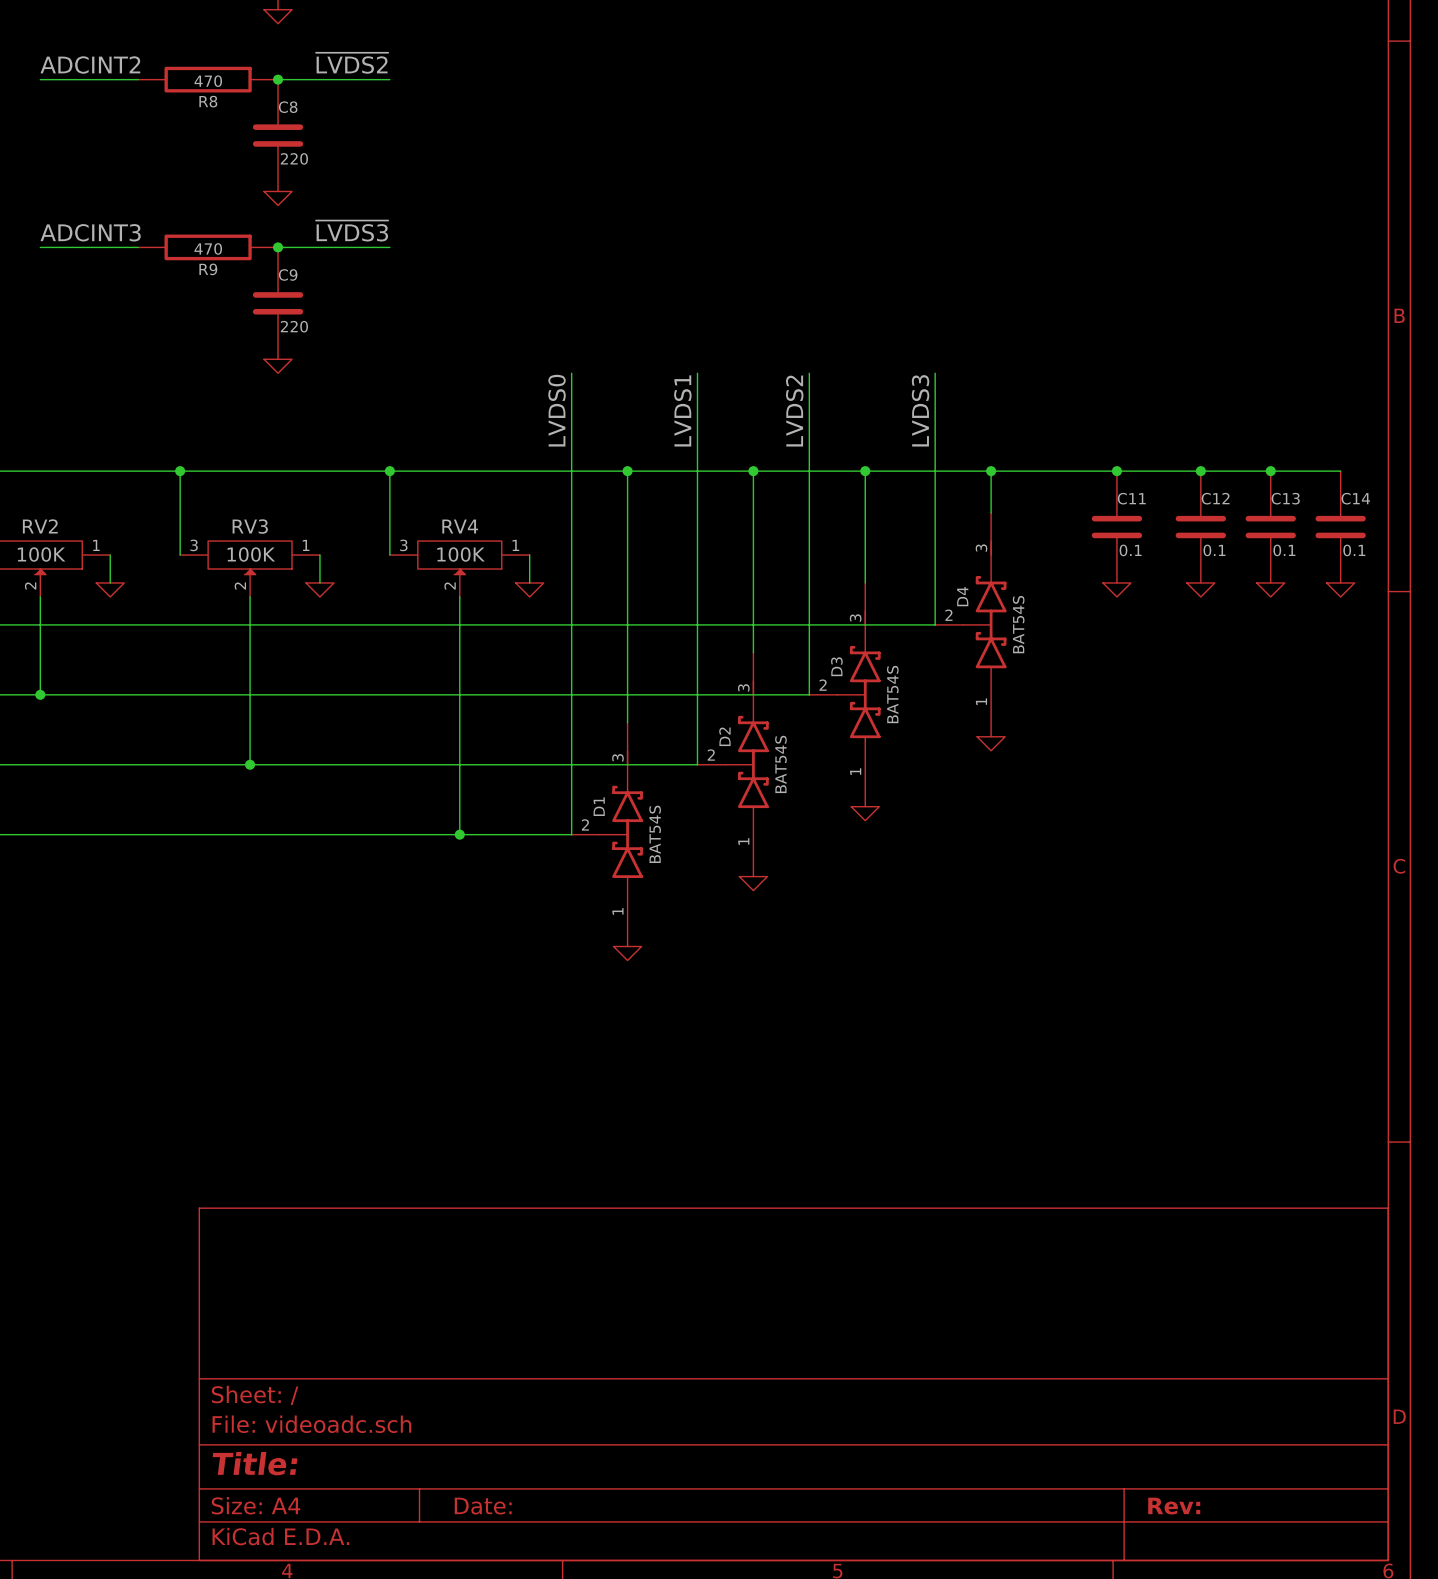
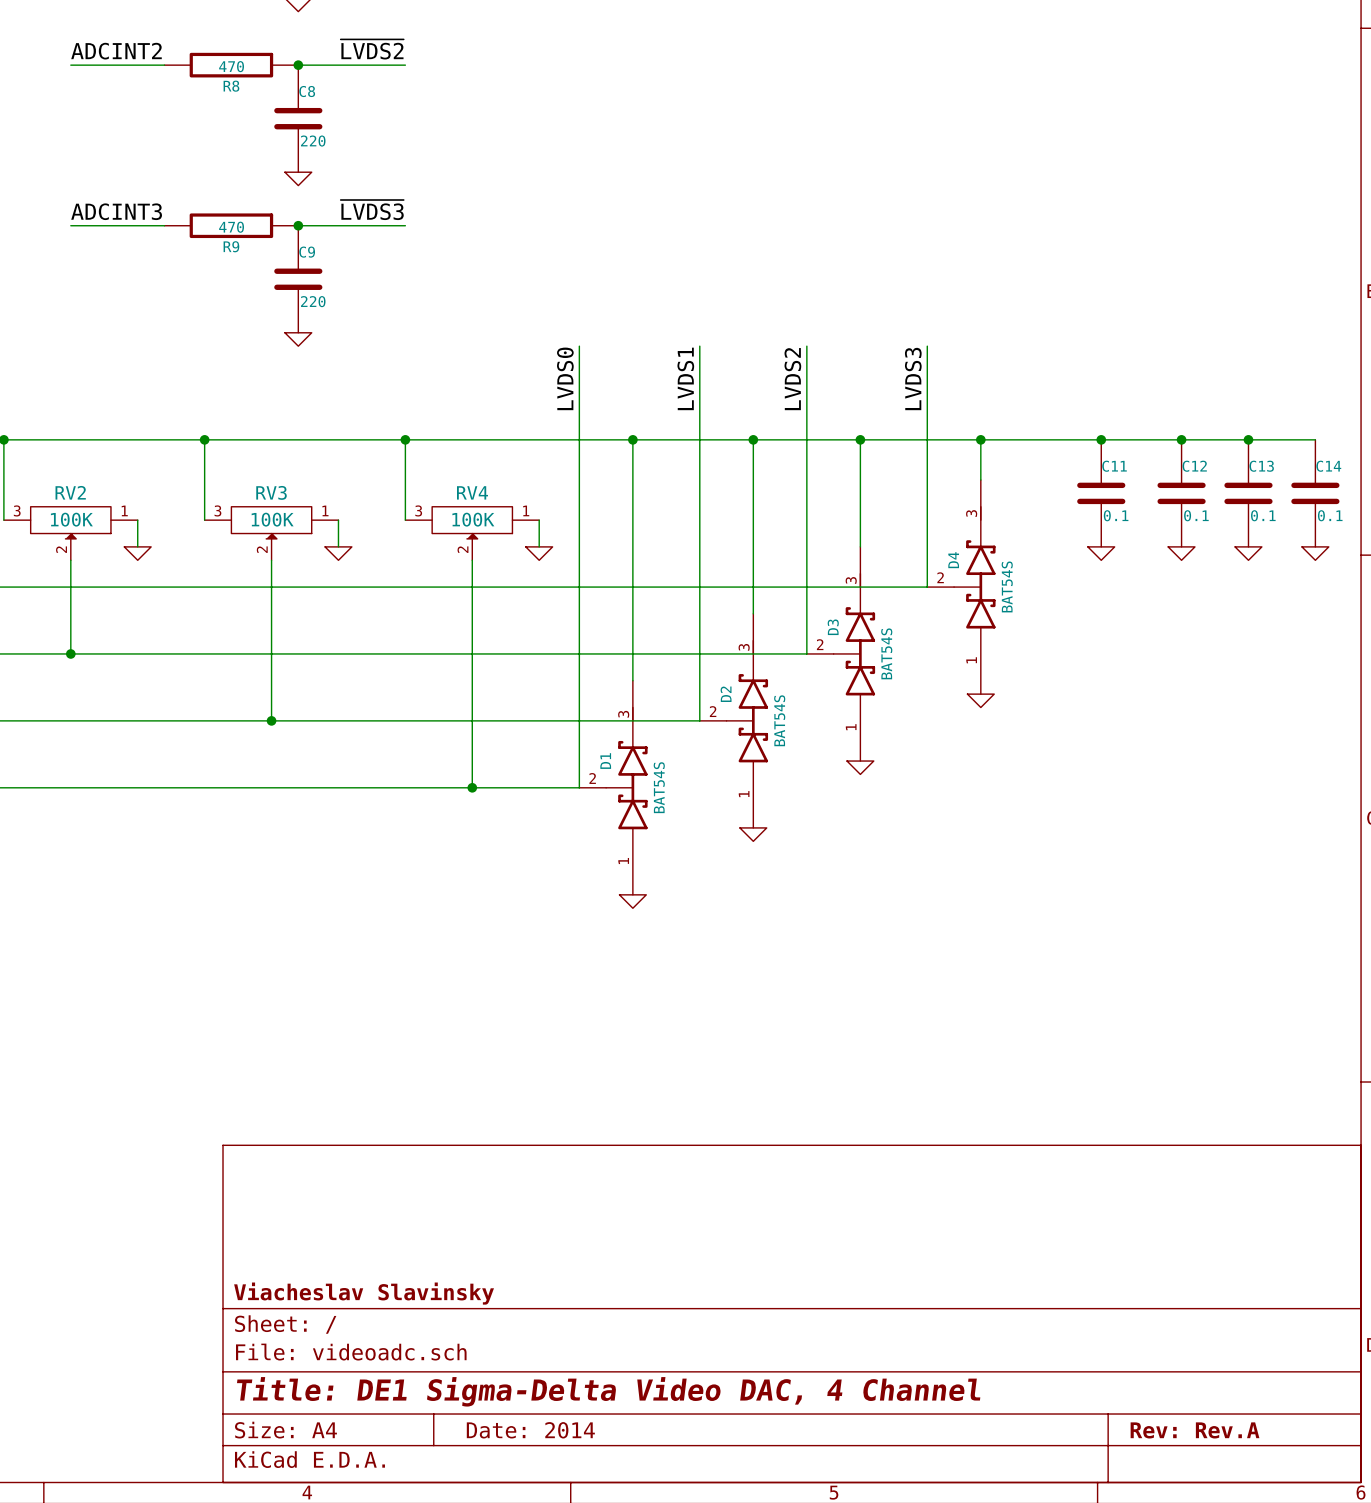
title block: none -> Viacheslav Slavinsky (364, 1293)
title block: Title: (255, 1463) -> Title: DE1 Sigma-Delta Video DAC, 4 Channel (608, 1391)
title block: Date: (483, 1506) -> Date: 2014 (530, 1430)
title block: Rev: (1174, 1506) -> Rev: Rev.A (1195, 1430)

